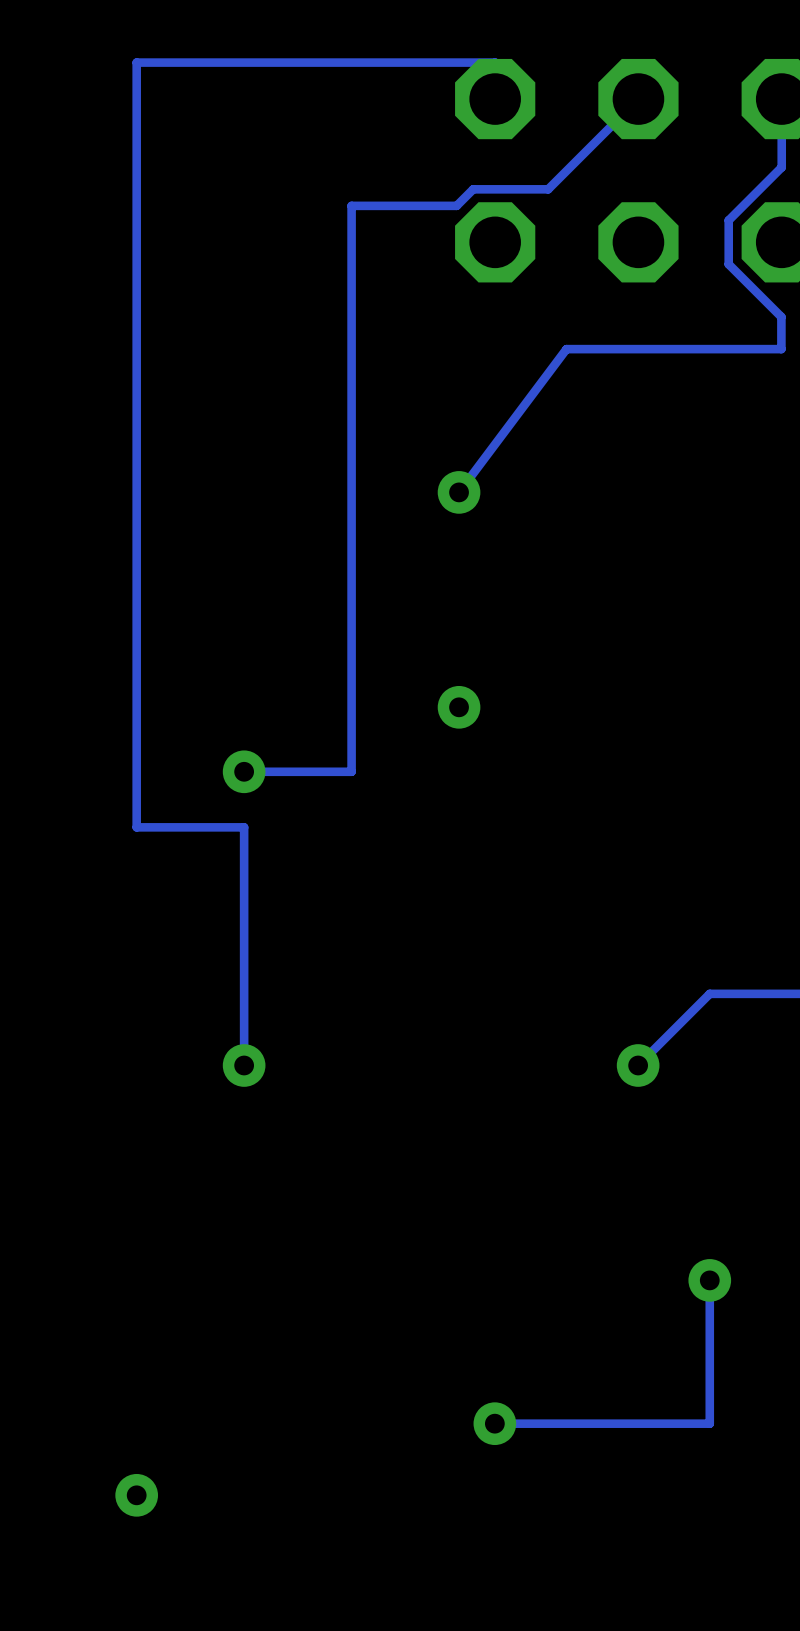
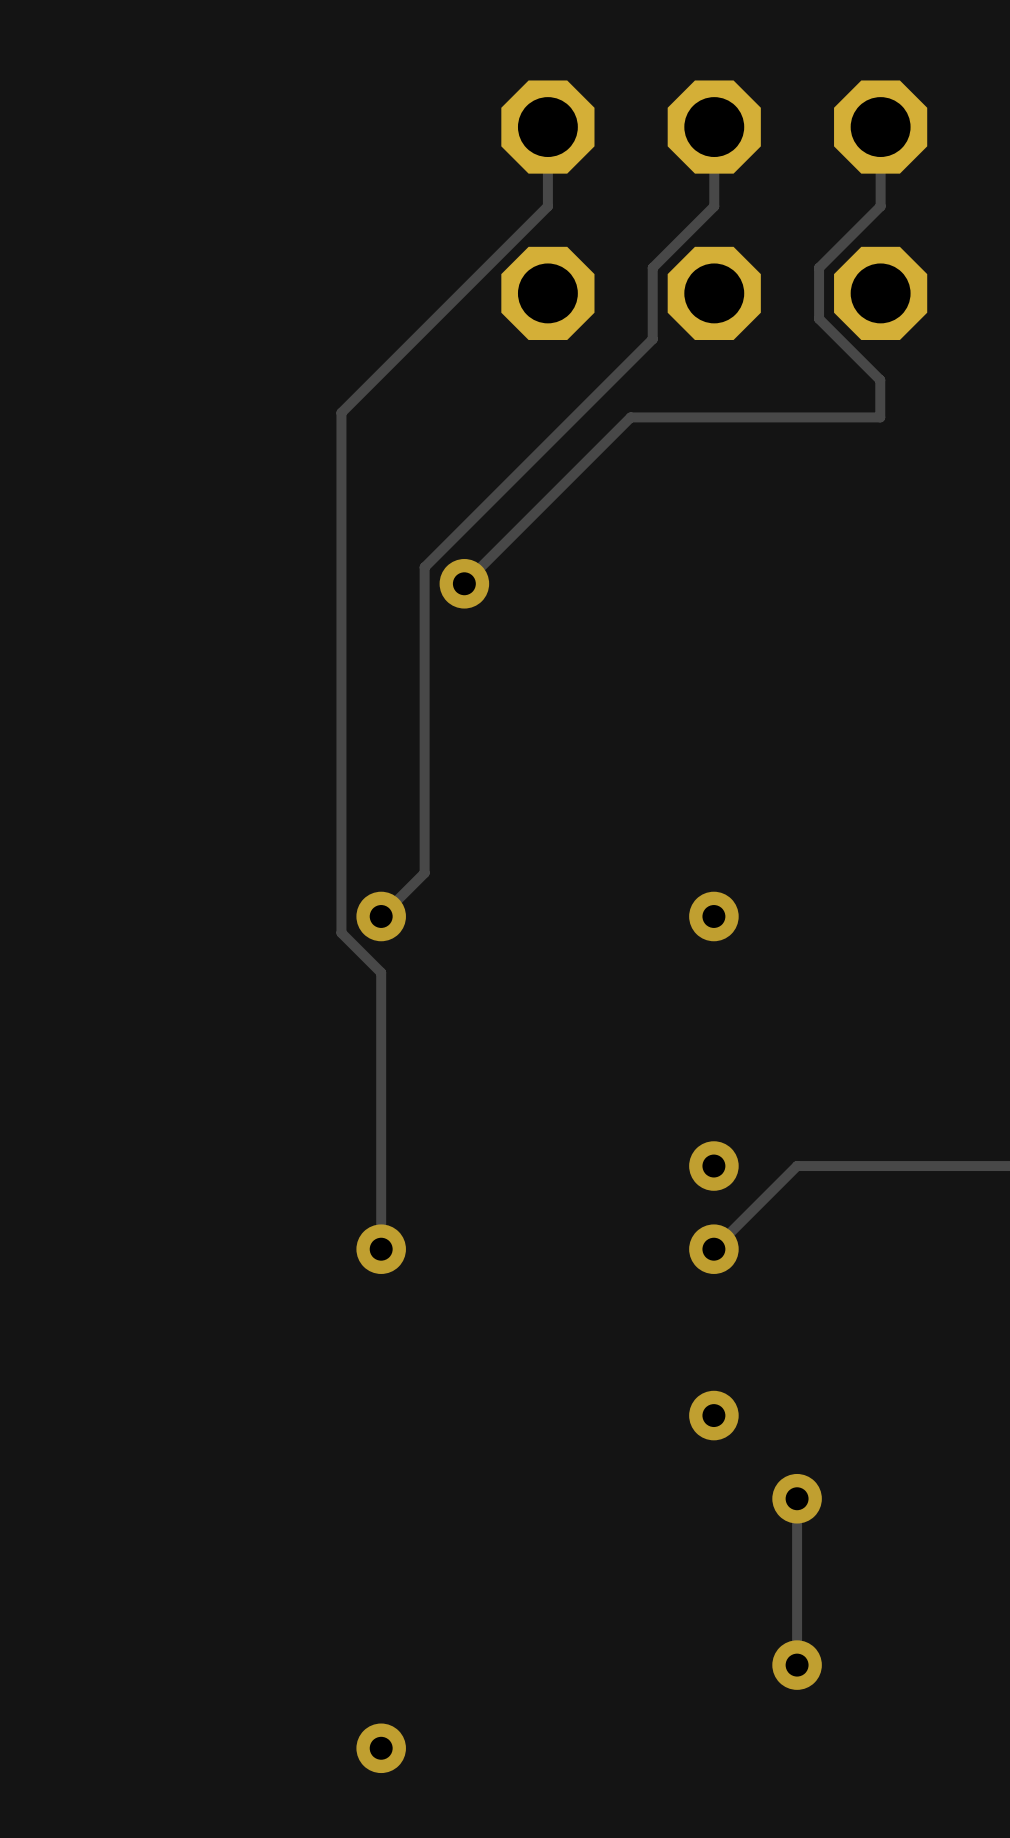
track: (495, 99) (495, 62) (136, 62) (136, 827) (244, 827) (244, 1065) -> none
track: (638, 99) (548, 189) (473, 189) -> (547, 133) (547, 206) (522, 231)
track: none -> (714, 127) (714, 206) (652, 267) (652, 339) (424, 567) (424, 873) (381, 916)
track: (456, 205) (351, 205) (351, 771) (244, 771) -> (503, 251) (341, 412) (341, 932) (381, 972) (381, 1249)
track: (566, 349) (459, 492) -> (630, 417) (464, 583)
via position: (459, 492) -> (464, 583)
via: (459, 707) -> none
via: (244, 771) -> none
via: none -> (381, 916)
via: none -> (713, 916)
via: none -> (713, 1166)
via position: (244, 1065) -> (381, 1249)
via: none -> (713, 1415)
via: (494, 1423) -> none
track: (709, 1423) (494, 1423) -> none
via: none -> (797, 1665)
via: (136, 1495) -> none
via: none -> (381, 1748)

